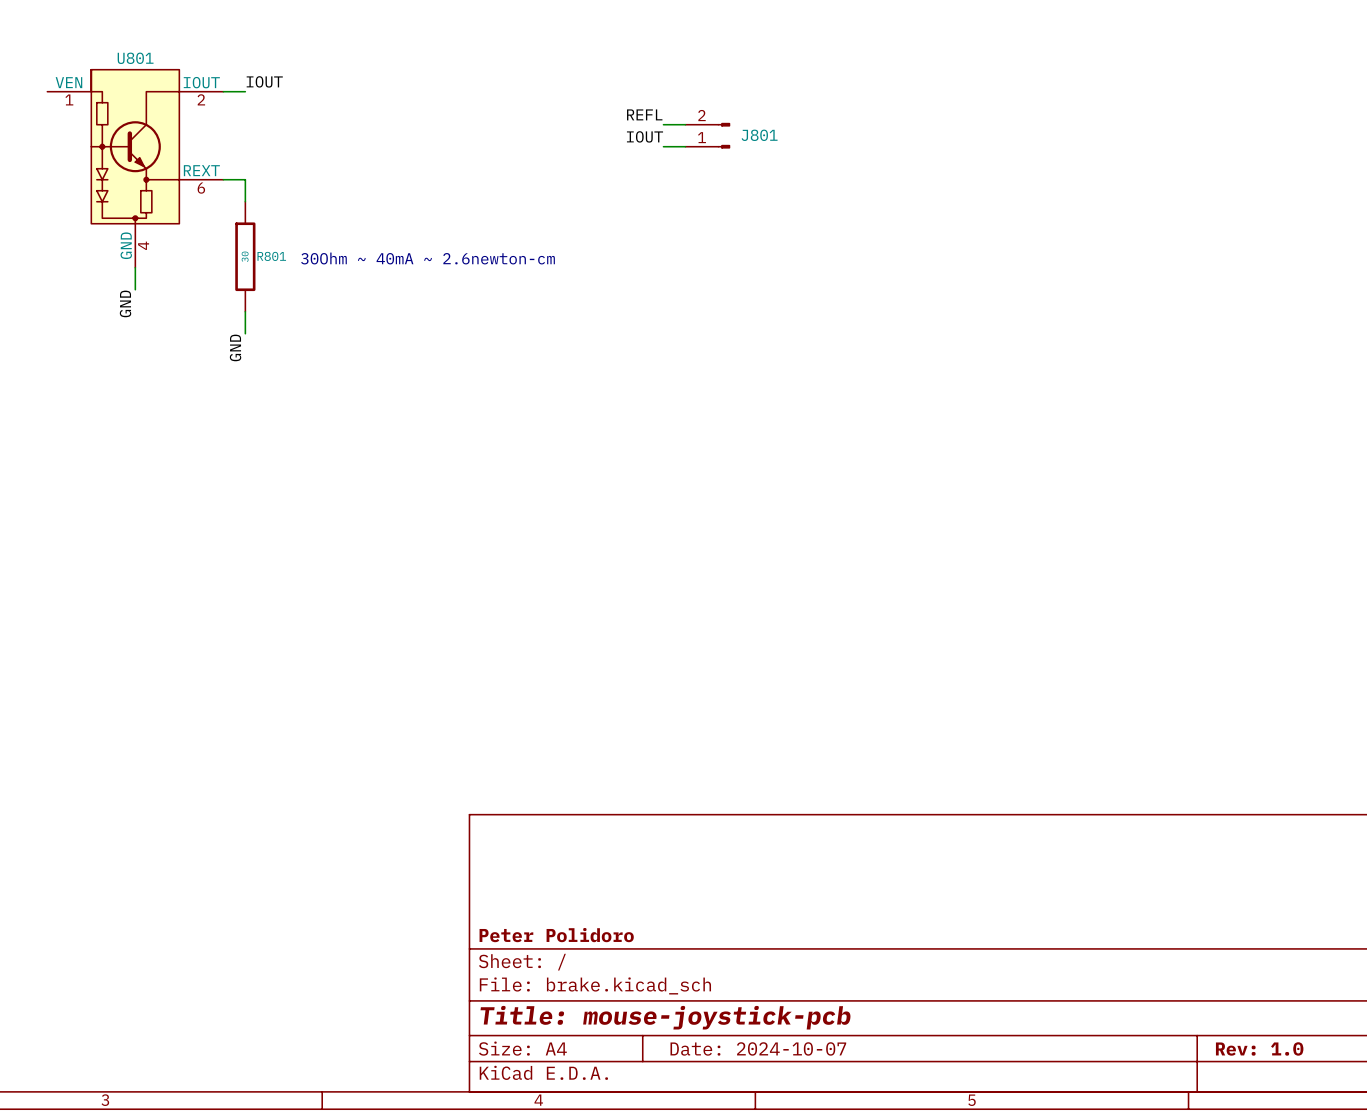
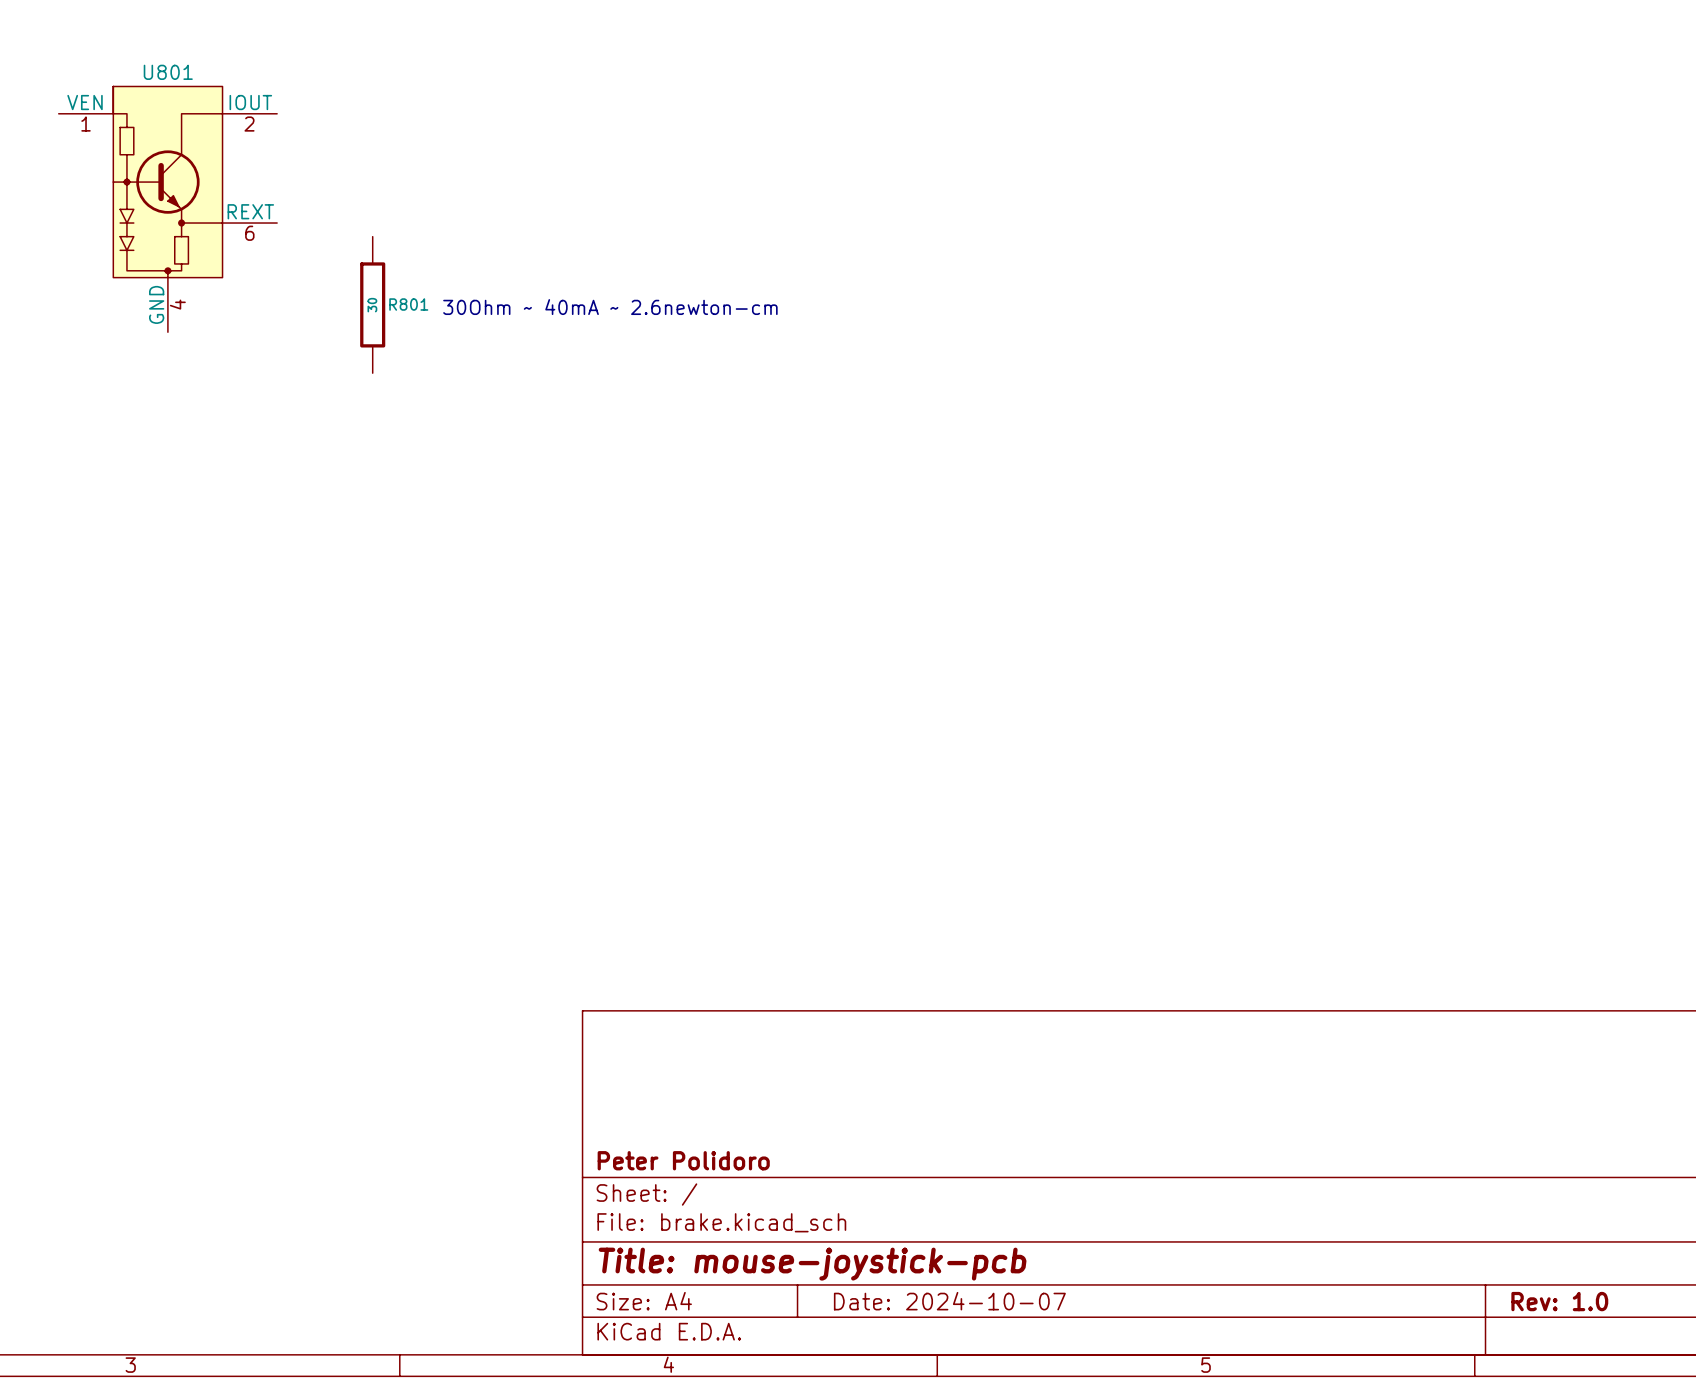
label: IOUT (264, 81) -> none
wire: (223, 91) (245, 91) -> none
label: REFL (644, 114) -> none
wire: (663, 124) (685, 124) -> none
J801: (707, 135) -> none
label: IOUT (645, 136) -> none
wire: (663, 146) (685, 146) -> none
wire: (223, 179) (245, 179) (245, 201) -> none
R801 position: (245, 256) -> (372, 304)
text position: 30Ohm ~ 40mA ~ 2.6newton-cm (428, 258) -> 30Ohm ~ 40mA ~ 2.6newton-cm (610, 307)
wire: (135, 267) (135, 289) -> none
label: GND (125, 303) -> none
wire: (245, 311) (245, 333) -> none
label: GND (235, 347) -> none

